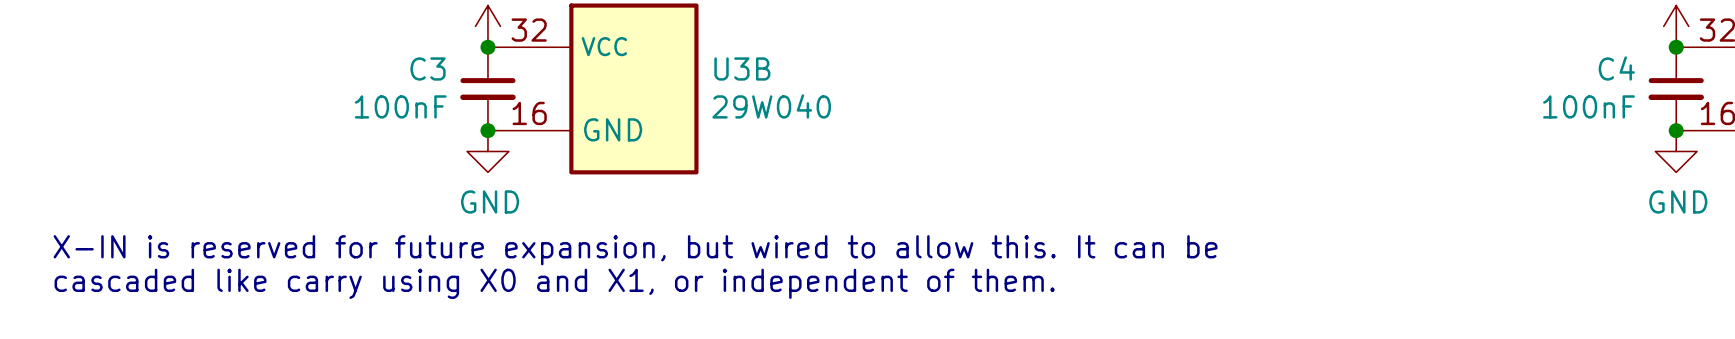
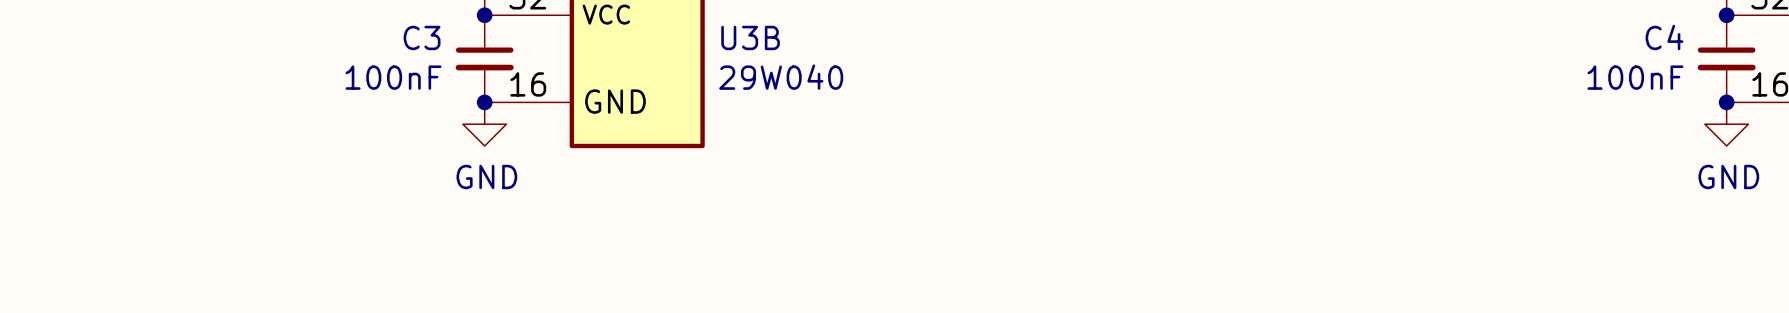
text: X-IN is reserved for future expansion, but wired to allow this. It can be (635, 250) -> none
text: cascaded like carry using X0 and X1, or independent of them. (554, 283) -> none

